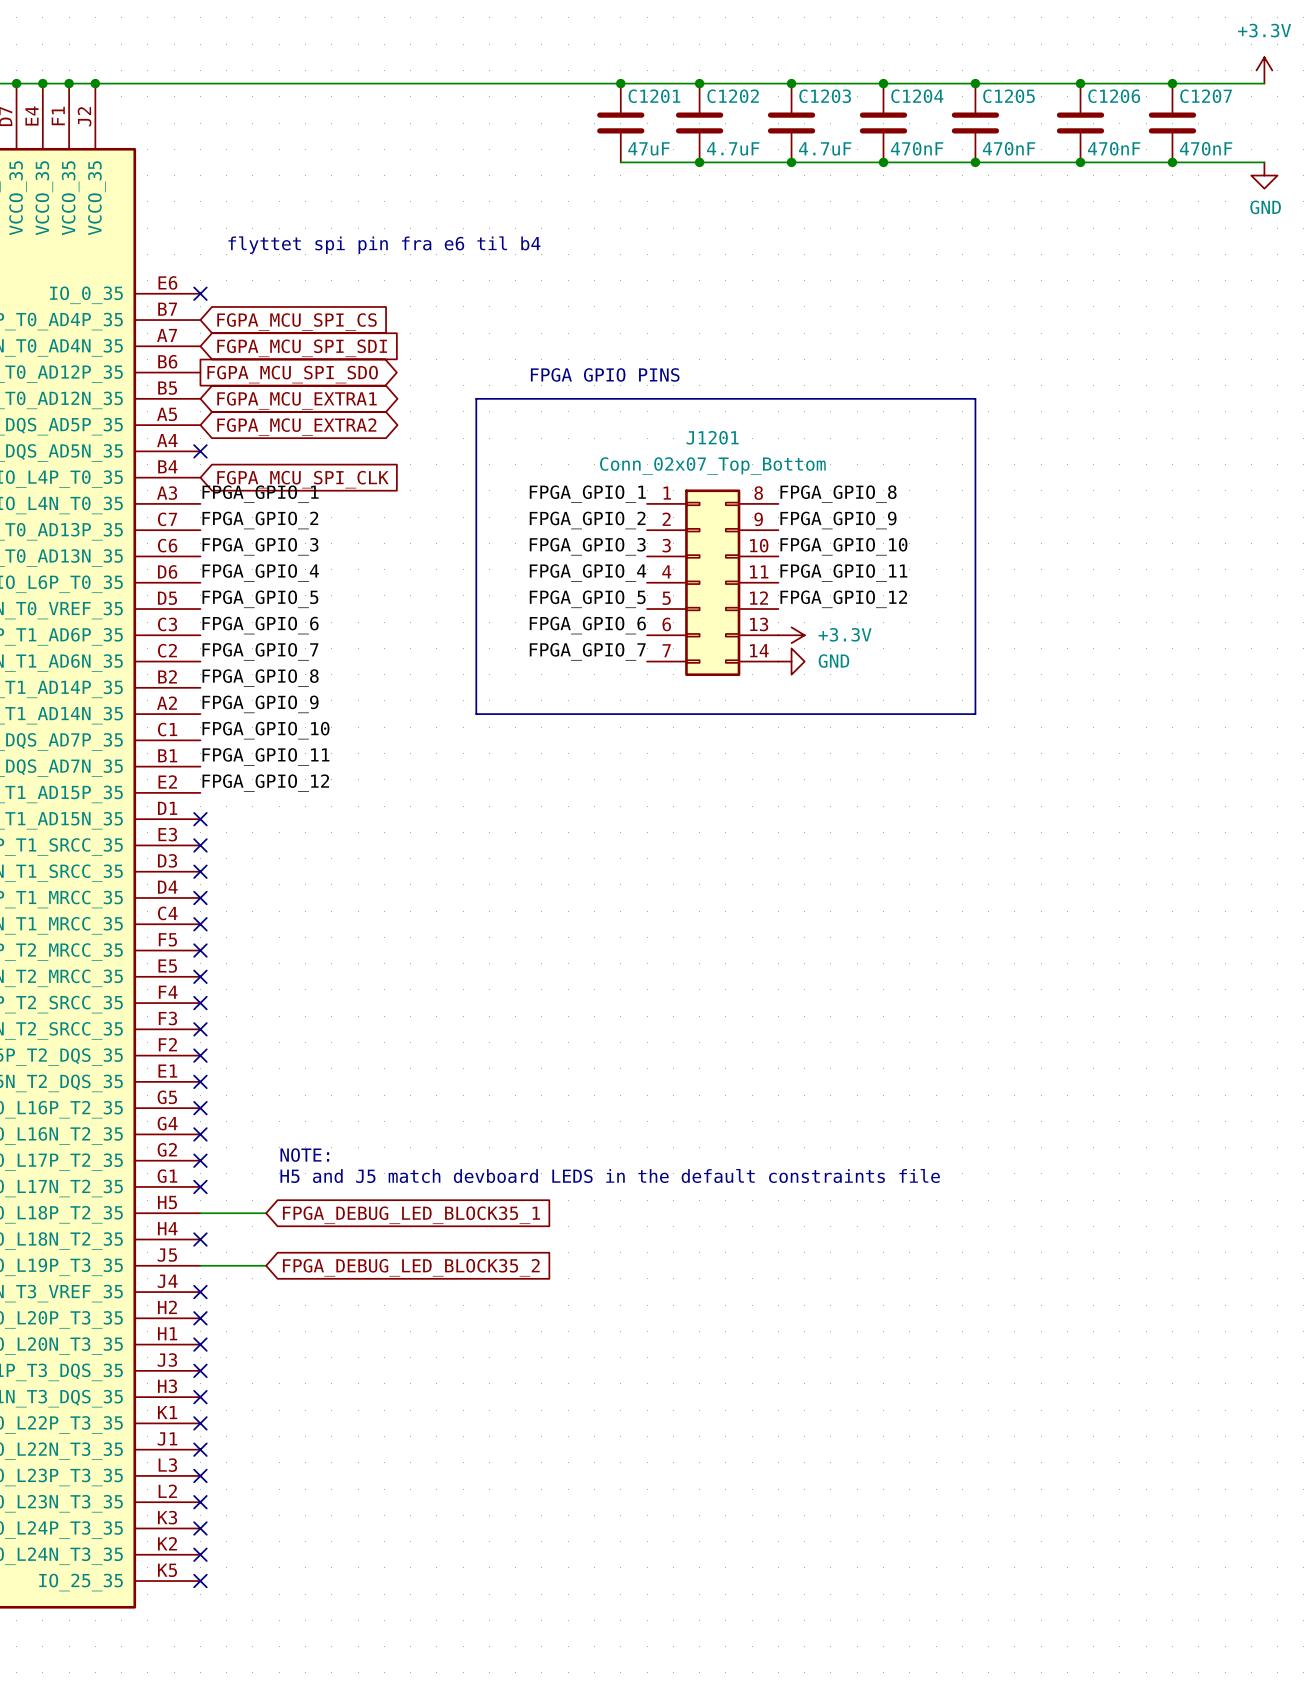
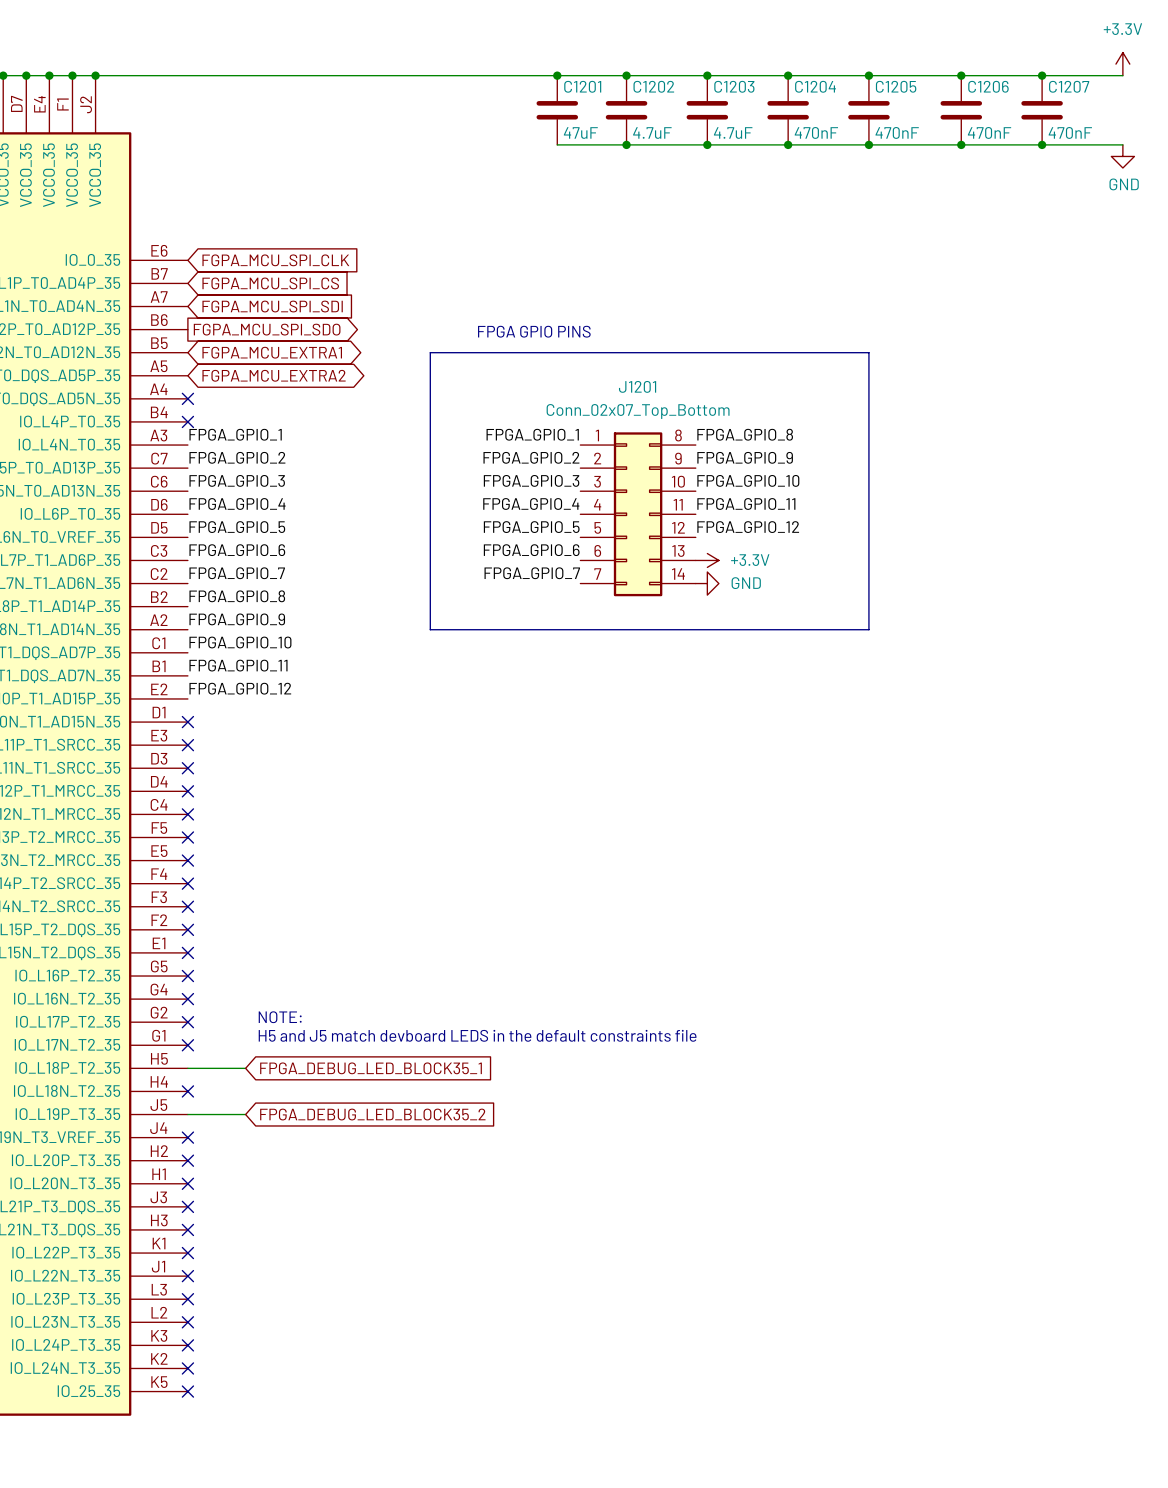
text: flyttet spi pin fra e6 til b4 (384, 245) -> none
no-connect mark: (200, 293) -> none
no-connect mark: none -> (187, 421)
global label position: FGPA_MCU_SPI_CLK (302, 479) -> FGPA_MCU_SPI_CLK (275, 260)

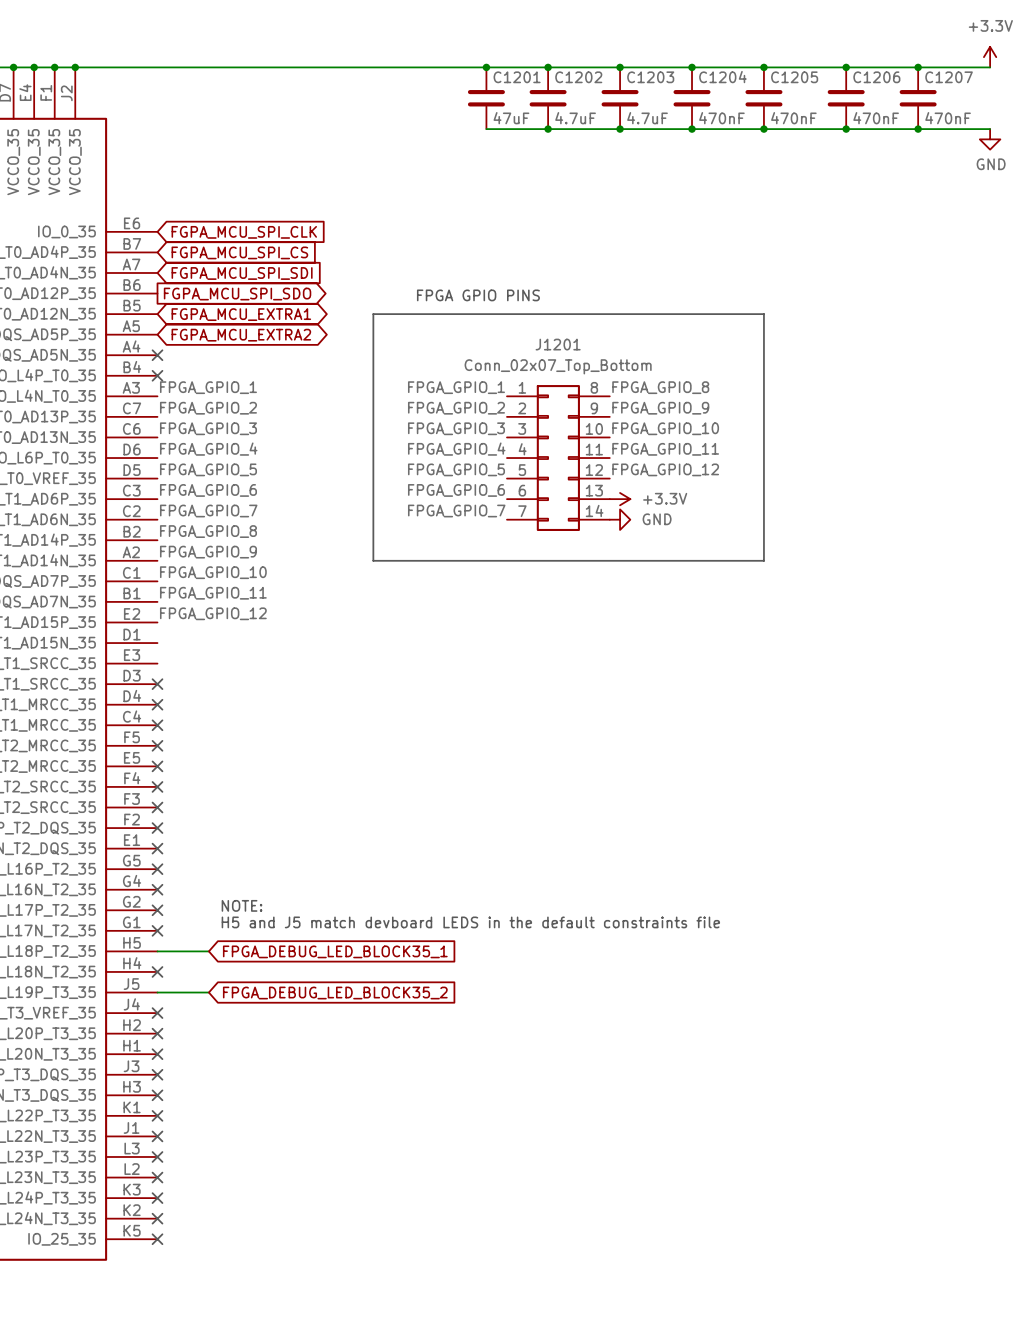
no-connect mark: (187, 722) -> none
no-connect mark: (187, 745) -> none

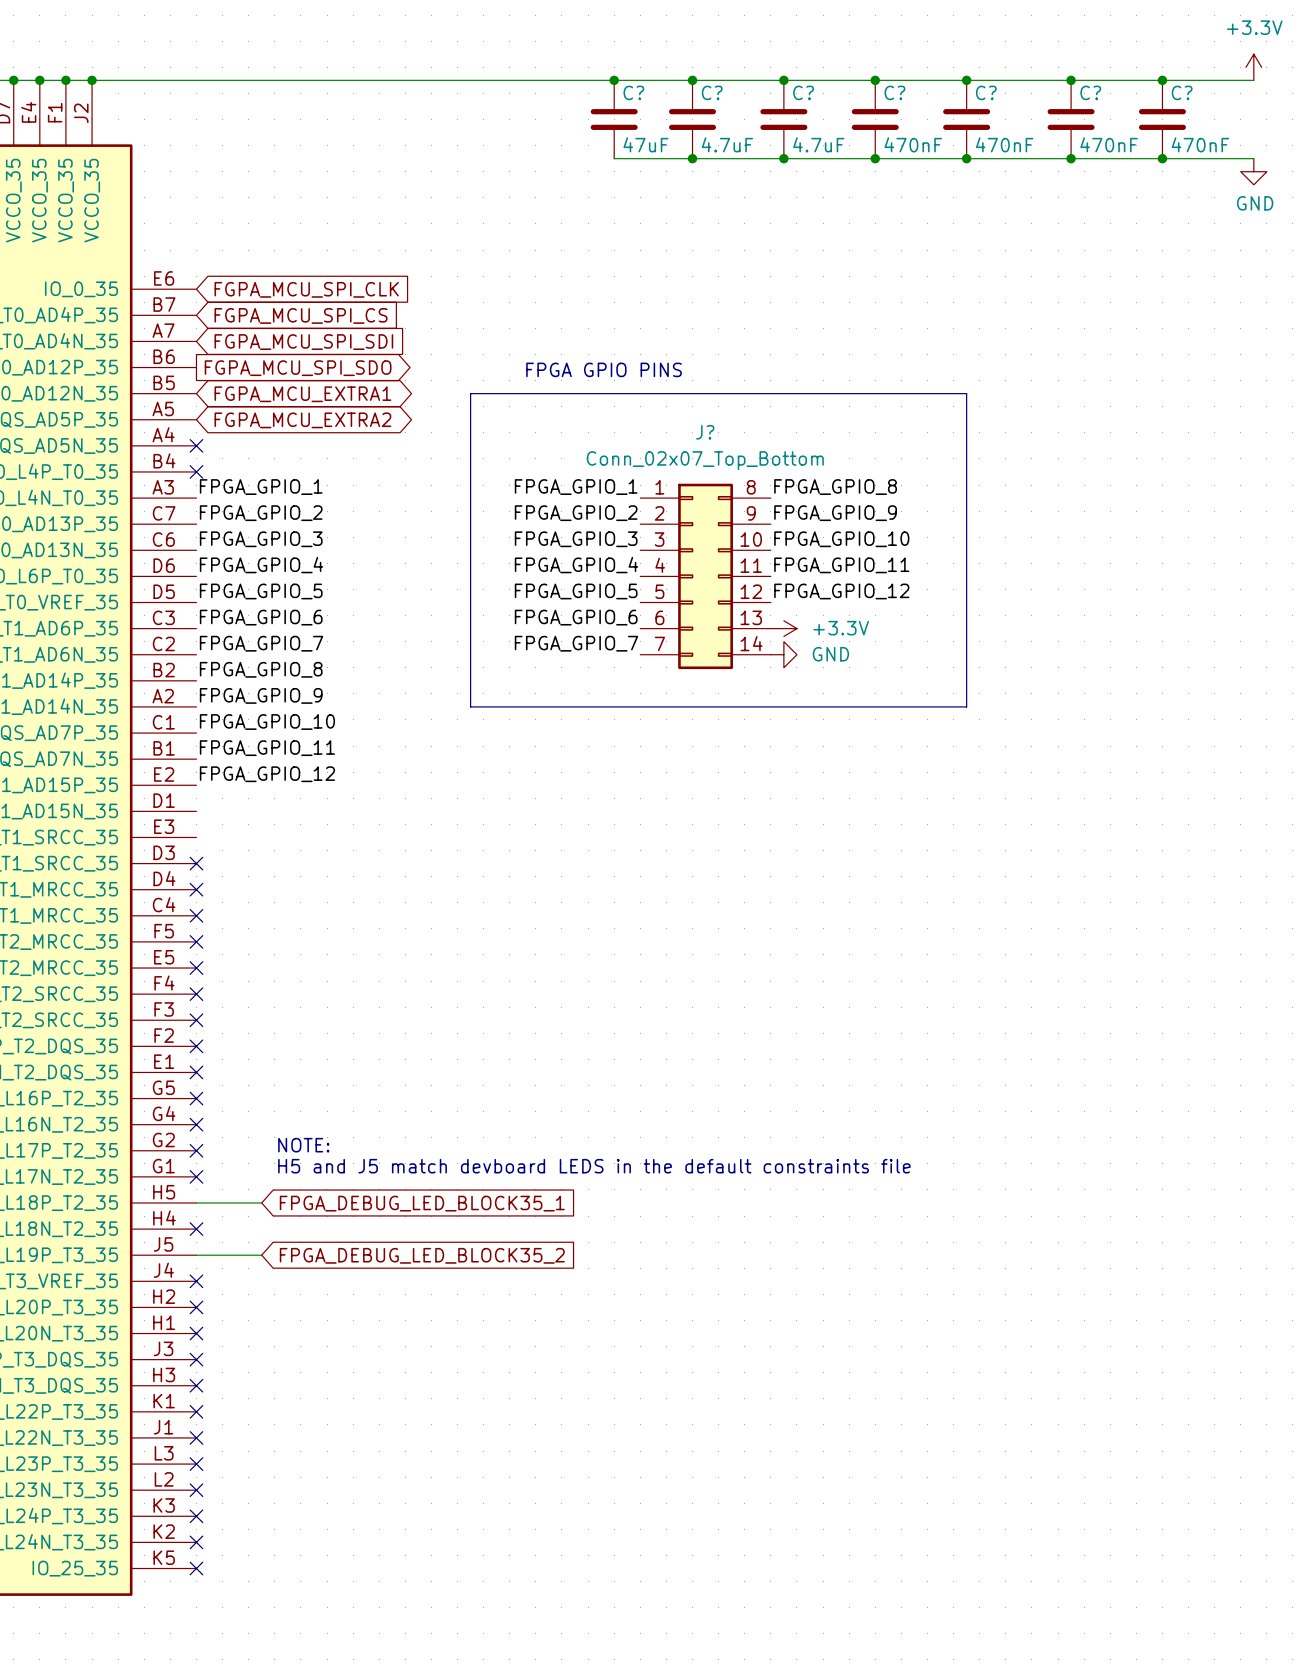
C1201 name: C1201 (517, 77) -> C? (633, 92)
C1202 name: C1202 (578, 77) -> C? (712, 92)
C1203 name: C1203 (650, 77) -> C? (803, 92)
C1204 name: C1204 (722, 77) -> C? (894, 92)
C1205 name: C1205 (794, 77) -> C? (986, 92)
C1206 name: C1206 (876, 77) -> C? (1090, 92)
C1207 name: C1207 (949, 77) -> C? (1182, 92)
J1201 name: J1201 (558, 344) -> J? (705, 432)

